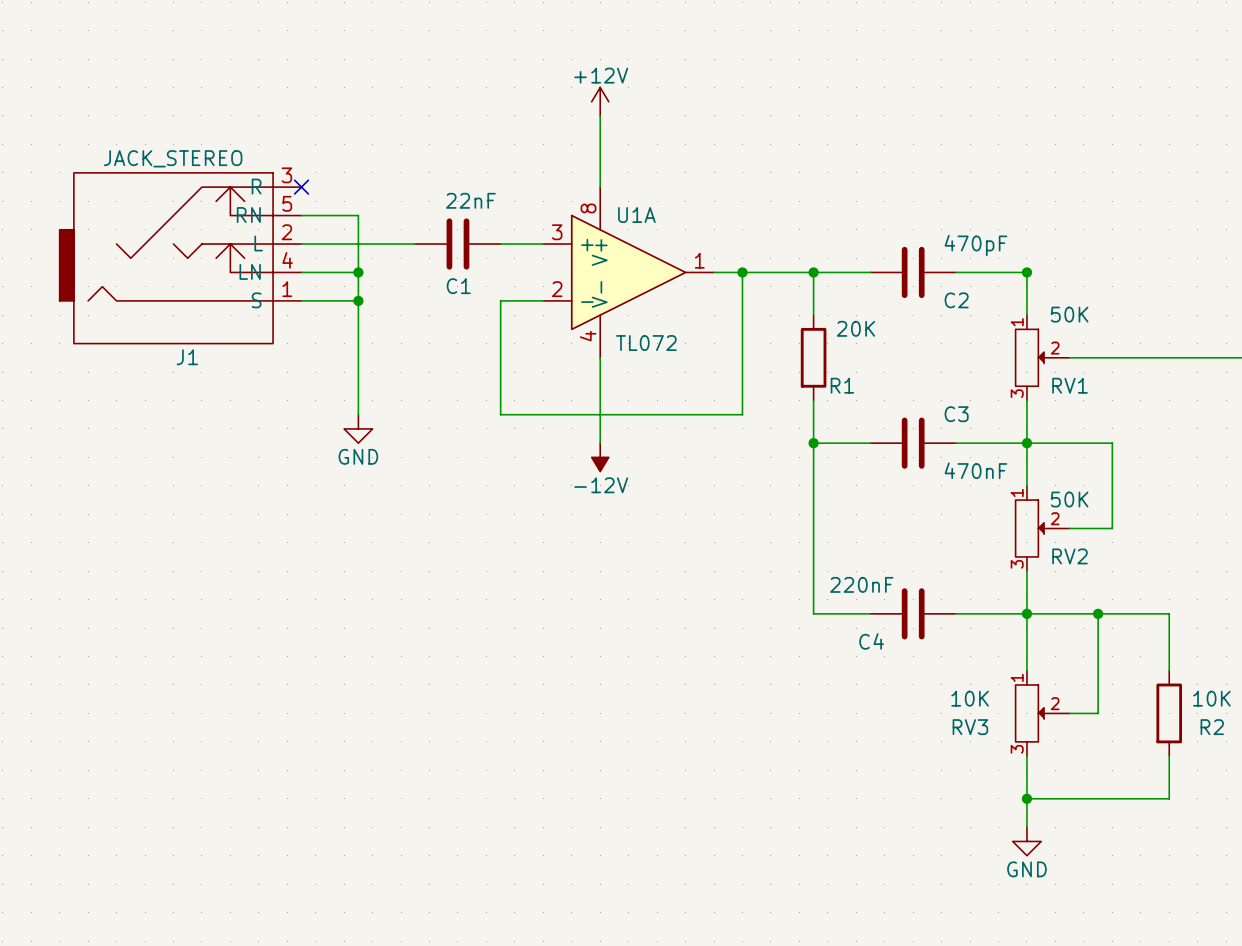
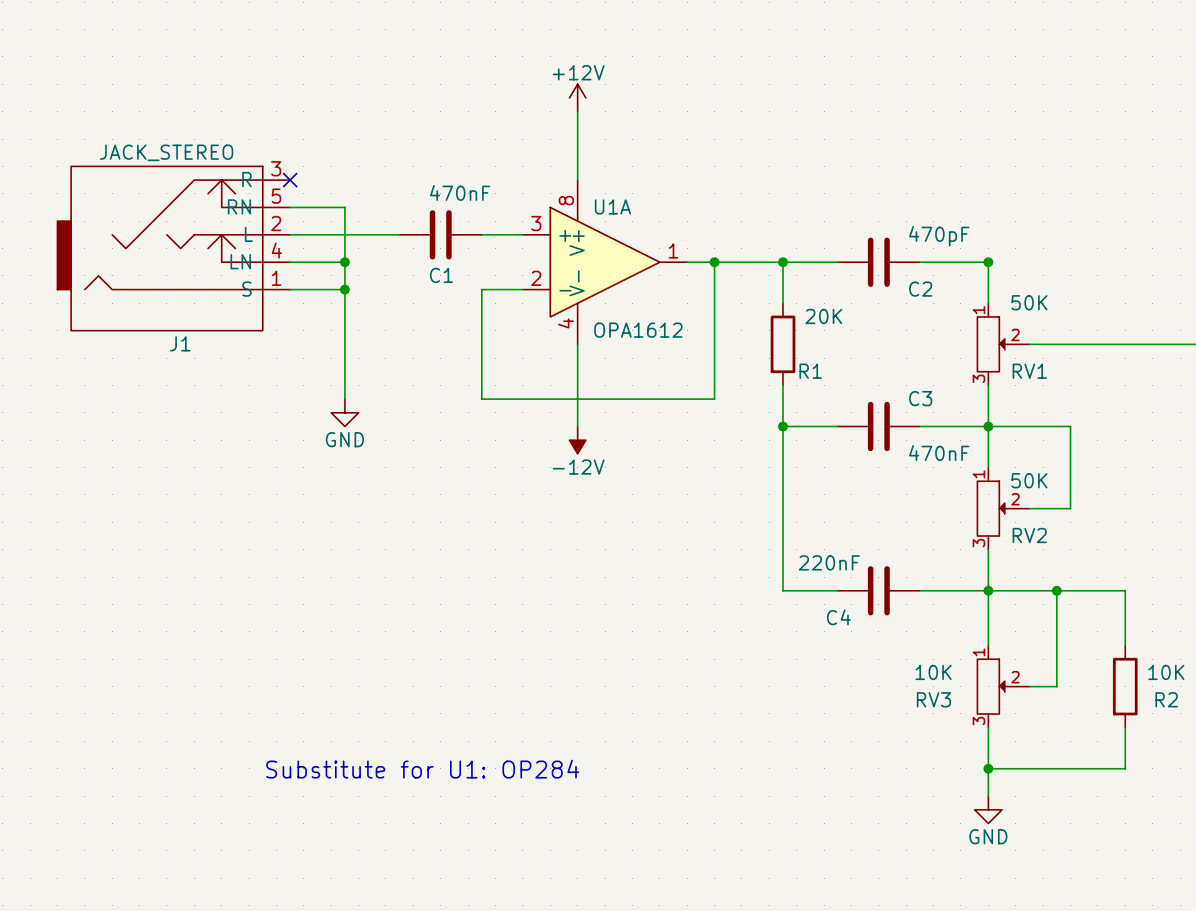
C1 value: 22nF (470, 200) -> 470nF (460, 192)
U1A value: TL072 (646, 343) -> OPA1612 (638, 330)
text: none -> Substitute for U1: OP284 (422, 769)

